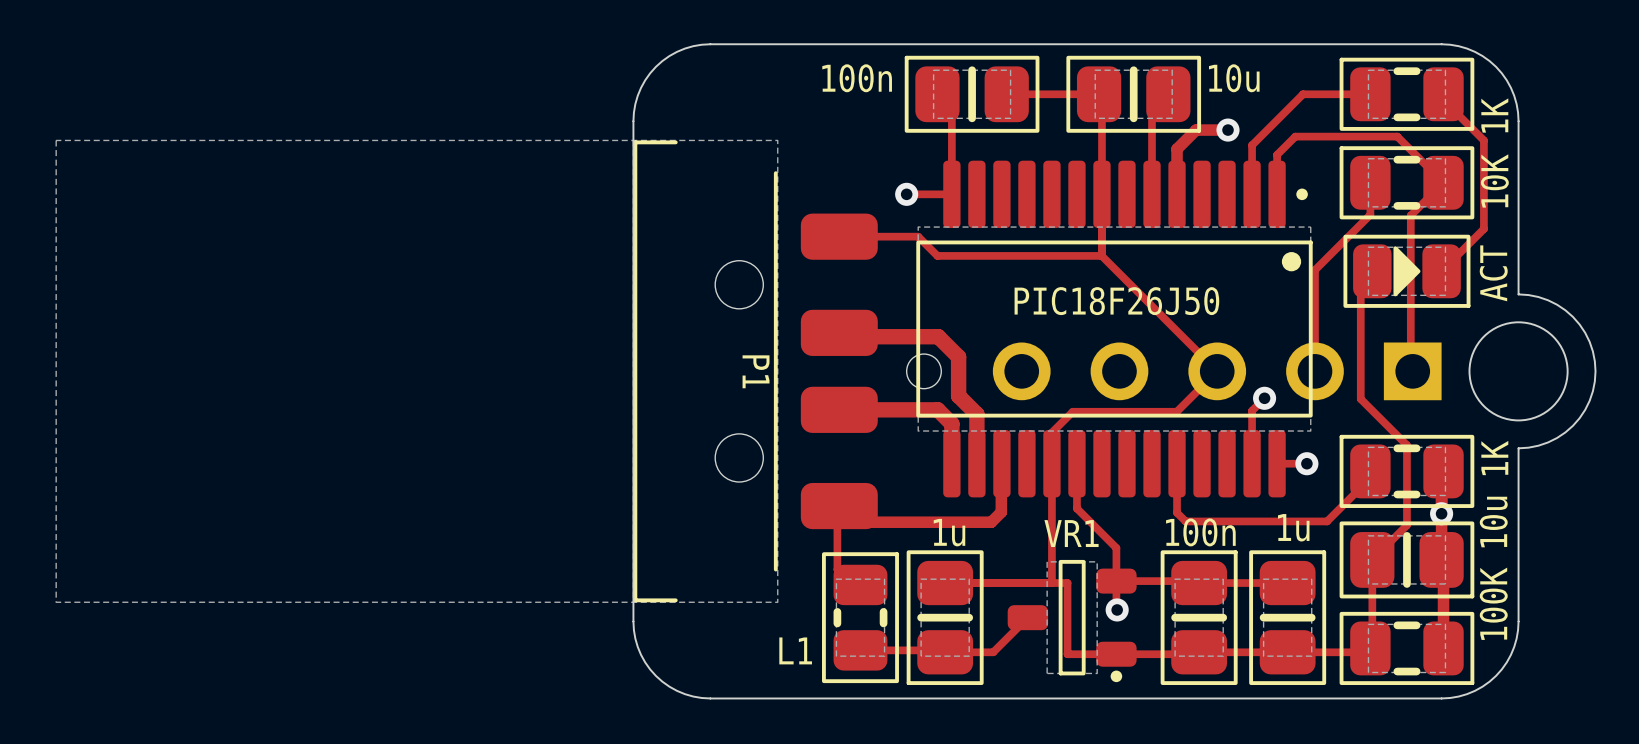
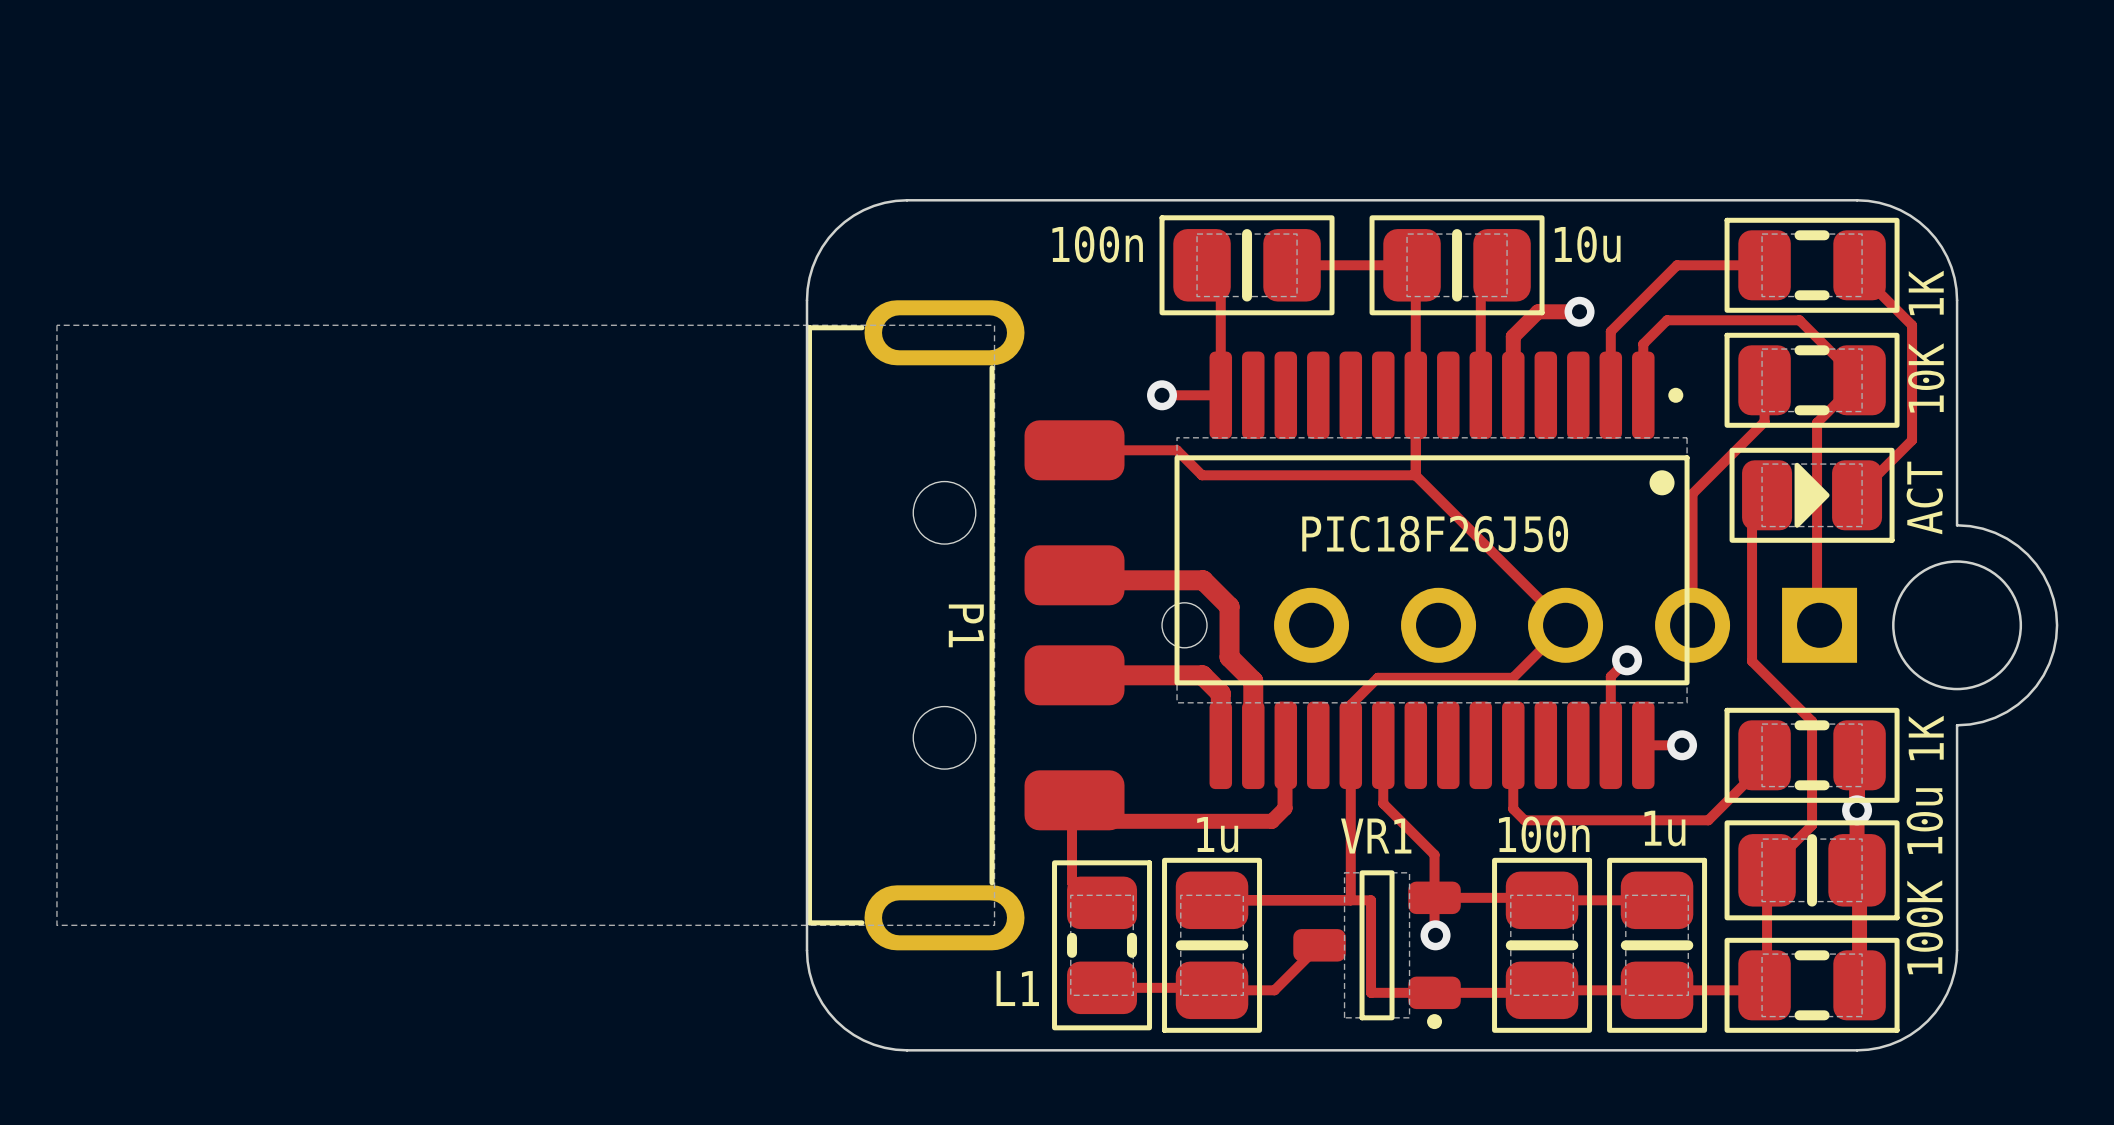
P1 footprint: [55, 132, 878, 610] -> [56, 300, 1125, 951]

